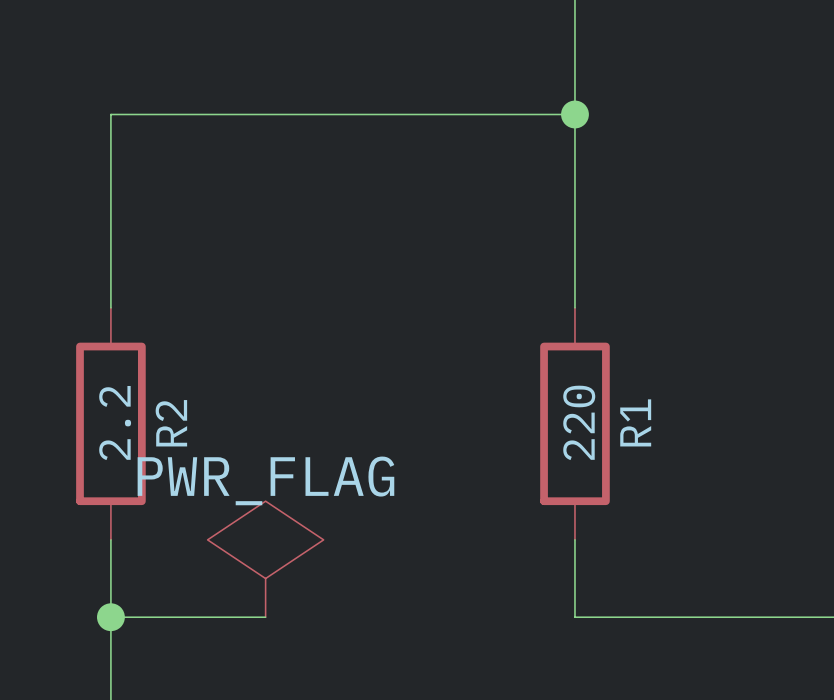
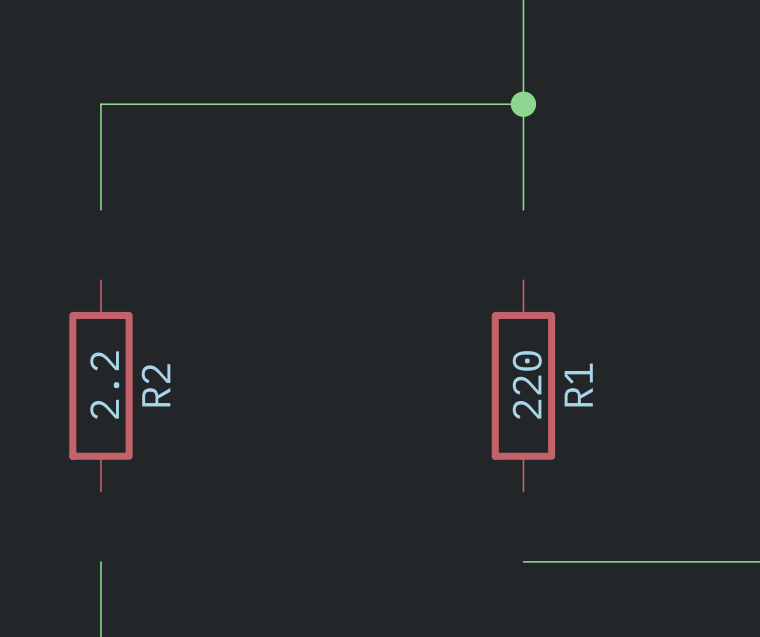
wire: (110, 230) (110, 307) -> none
wire: (574, 230) (574, 307) -> none
wire: (110, 539) (110, 617) (265, 617) -> none
wire: (574, 539) (574, 617) -> none
power symbol: PWR_FLAG (265, 559) -> none
junction: (110, 617) -> none

